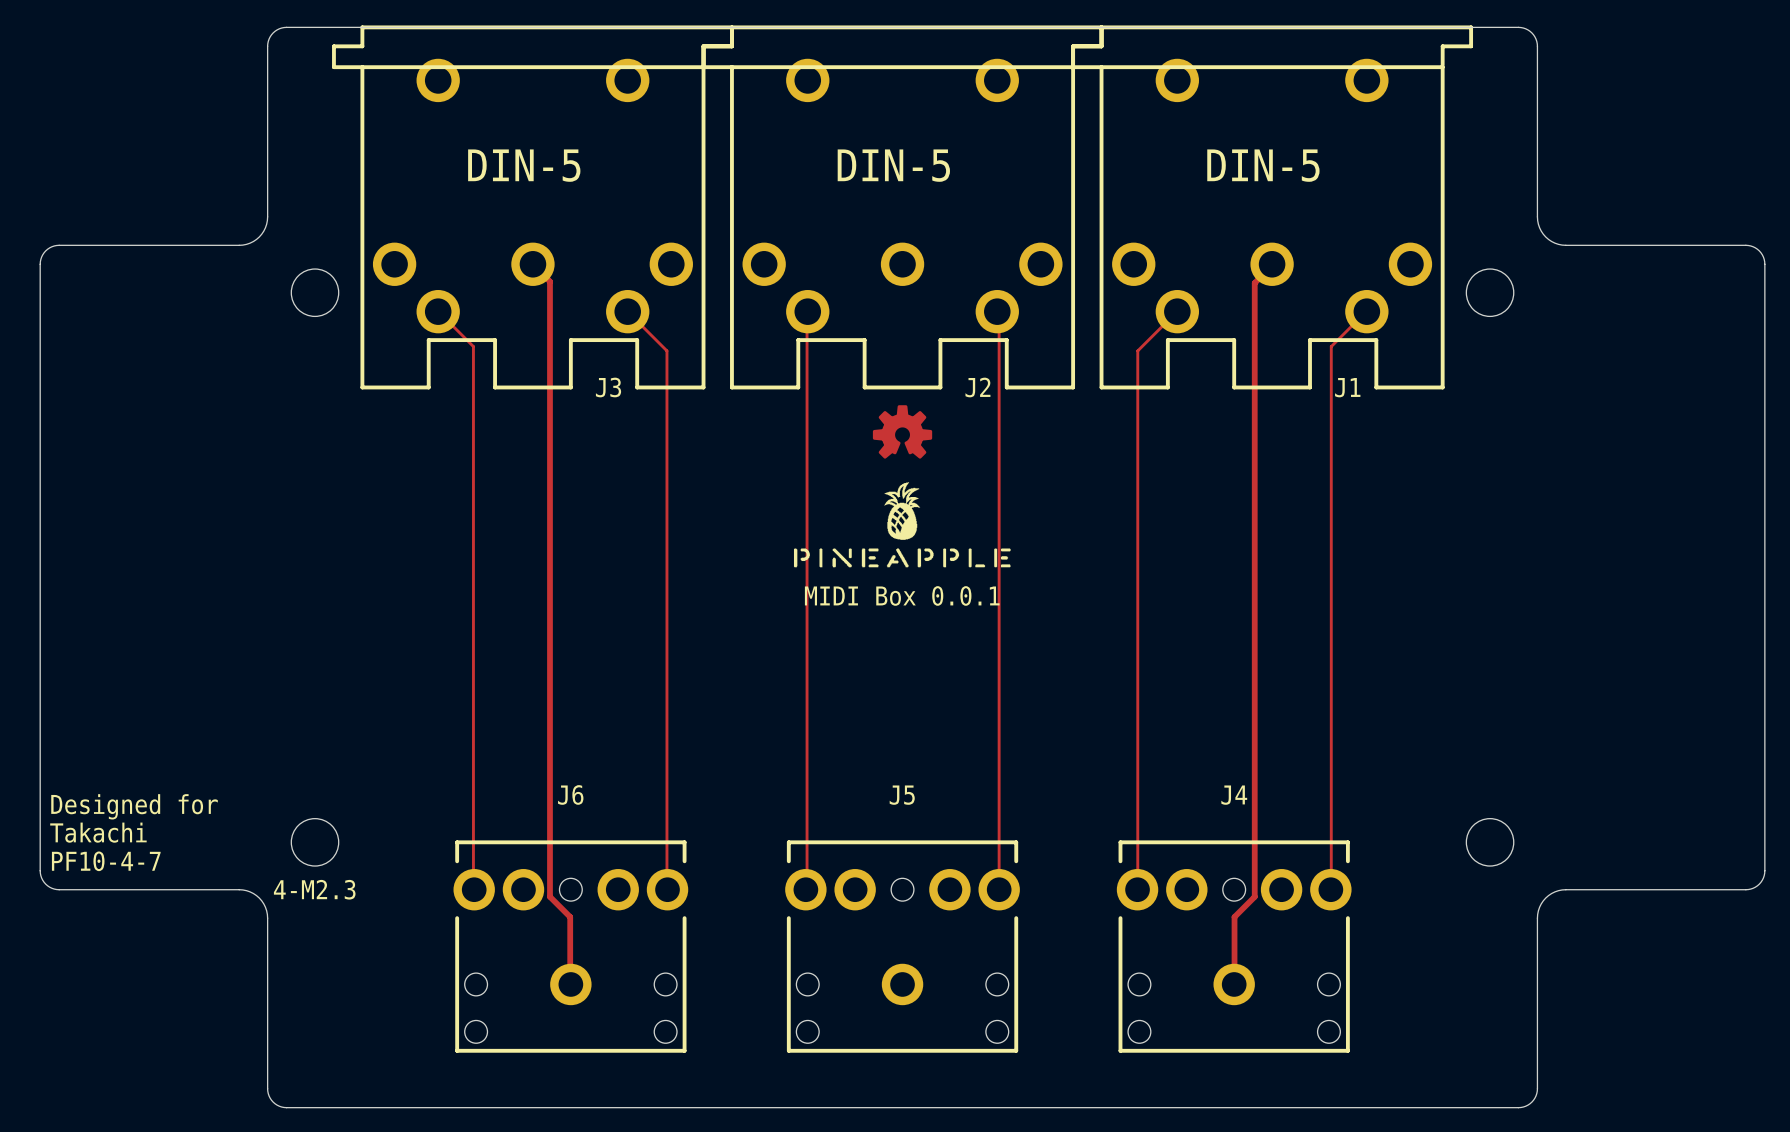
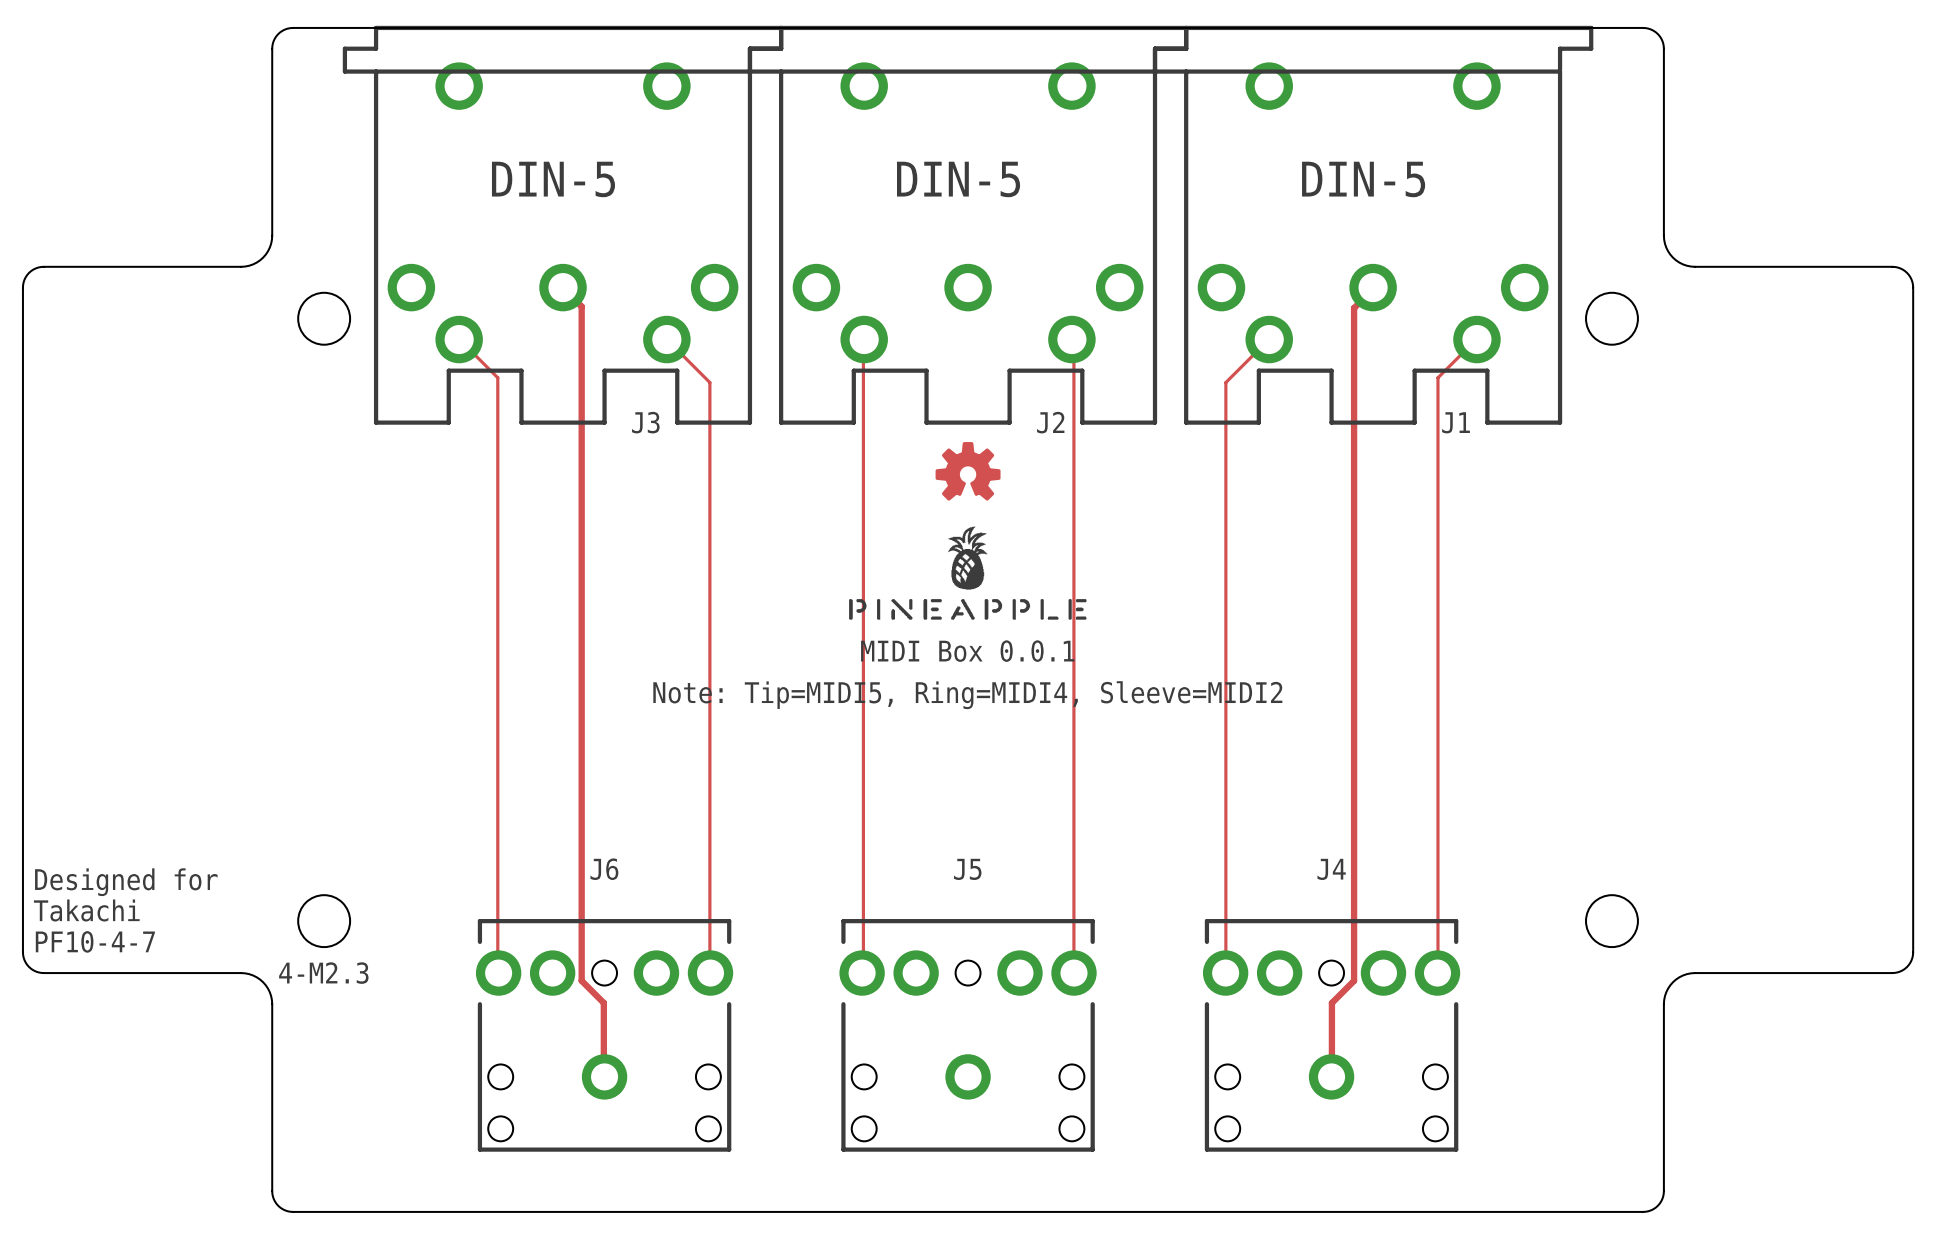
text: none -> Note: Tip=MIDI5, Ring=MIDI4, Sleeve=MIDI2 (967, 695)

